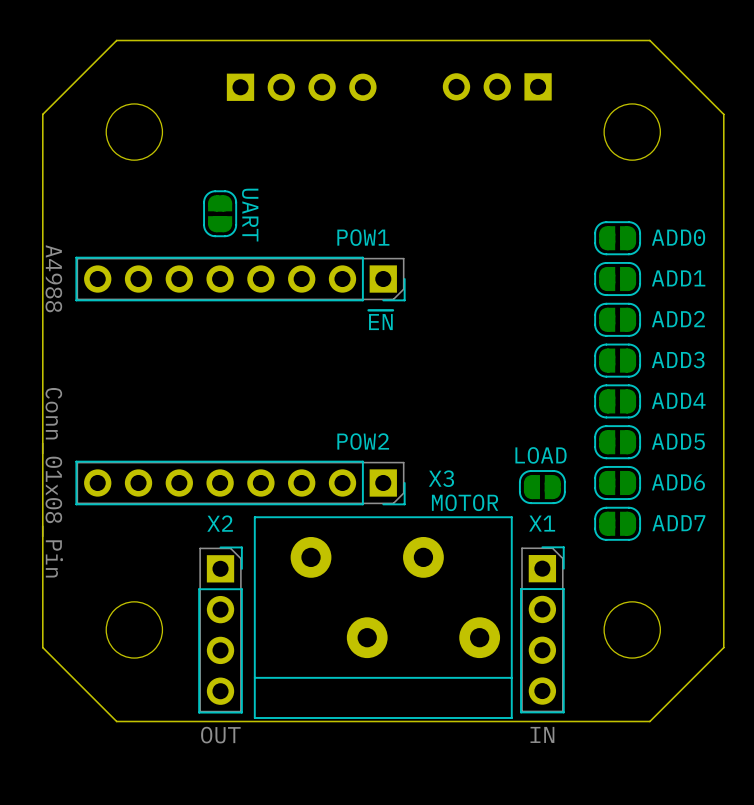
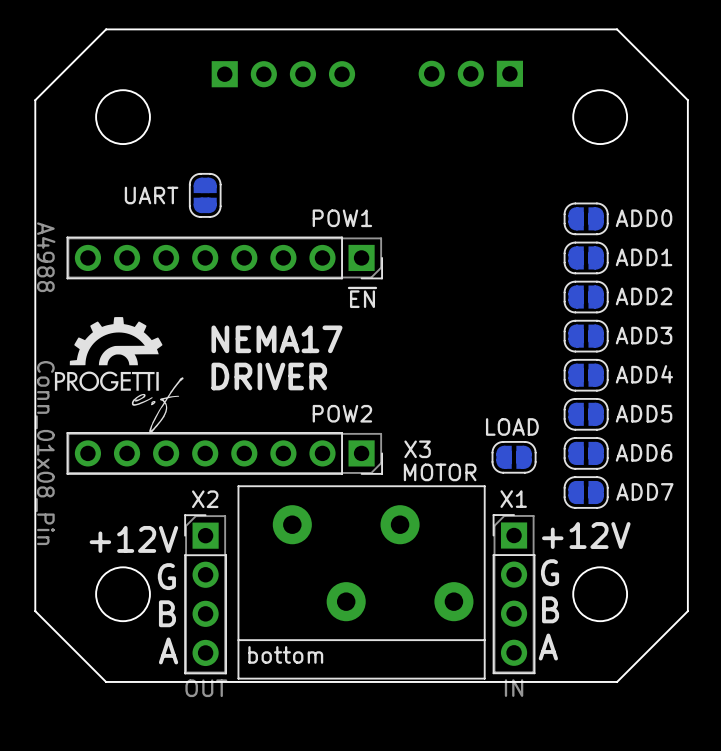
part value rotation: 0° (250, 215) -> 90° counterclockwise (151, 195)
part value position: UART (250, 215) -> UART (151, 195)
drawing: none -> [54, 317, 184, 434]
text: none -> NEMA17 (276, 339)
text: none -> DRIVER (269, 376)
X2 footprint: [198, 546, 243, 714] -> [184, 514, 227, 675]
X1 footprint: [520, 546, 565, 714] -> [492, 514, 536, 675]
text: none -> +12V (586, 535)
text: none -> +12V (133, 539)
text: none -> G (550, 572)
text: none -> G (166, 576)
text: none -> B (550, 609)
text: none -> B (167, 613)
text: none -> A (548, 647)
text: none -> A (168, 650)
text: none -> bottom (285, 654)

